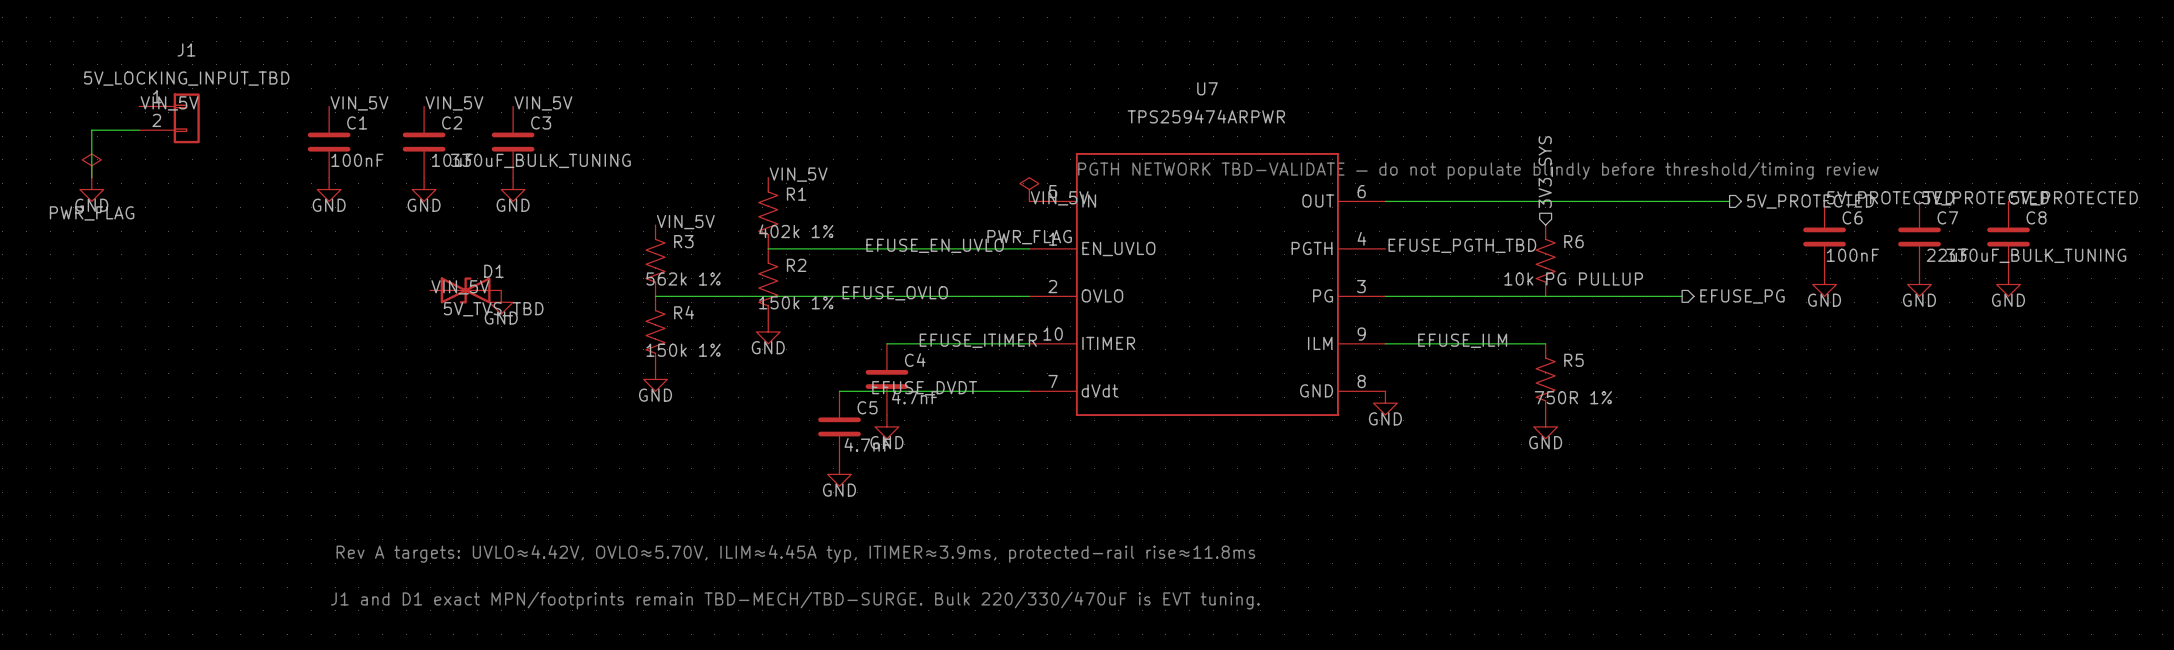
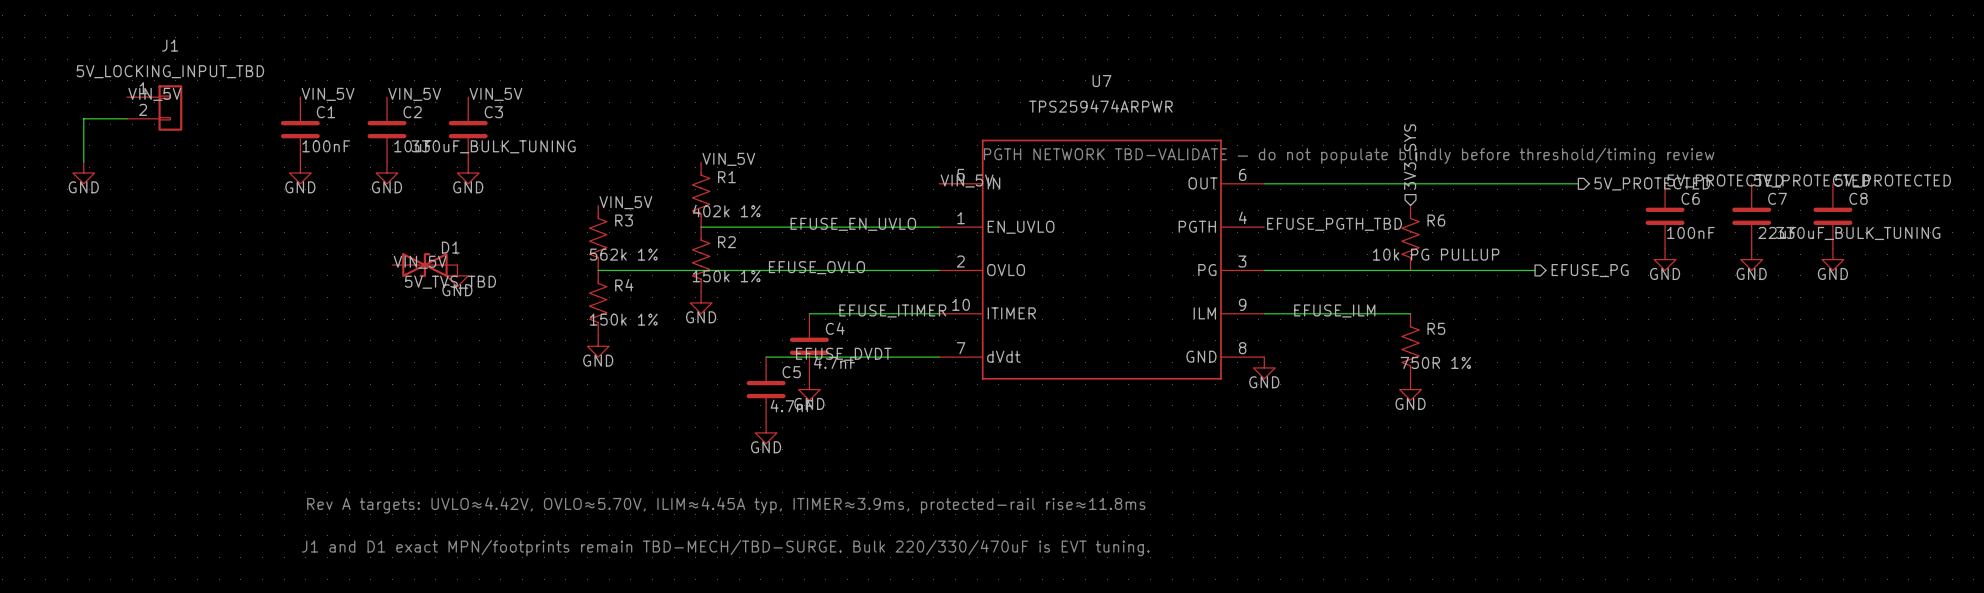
power symbol: PWR_FLAG (91, 165) -> none
power symbol: PWR_FLAG (1029, 189) -> none

